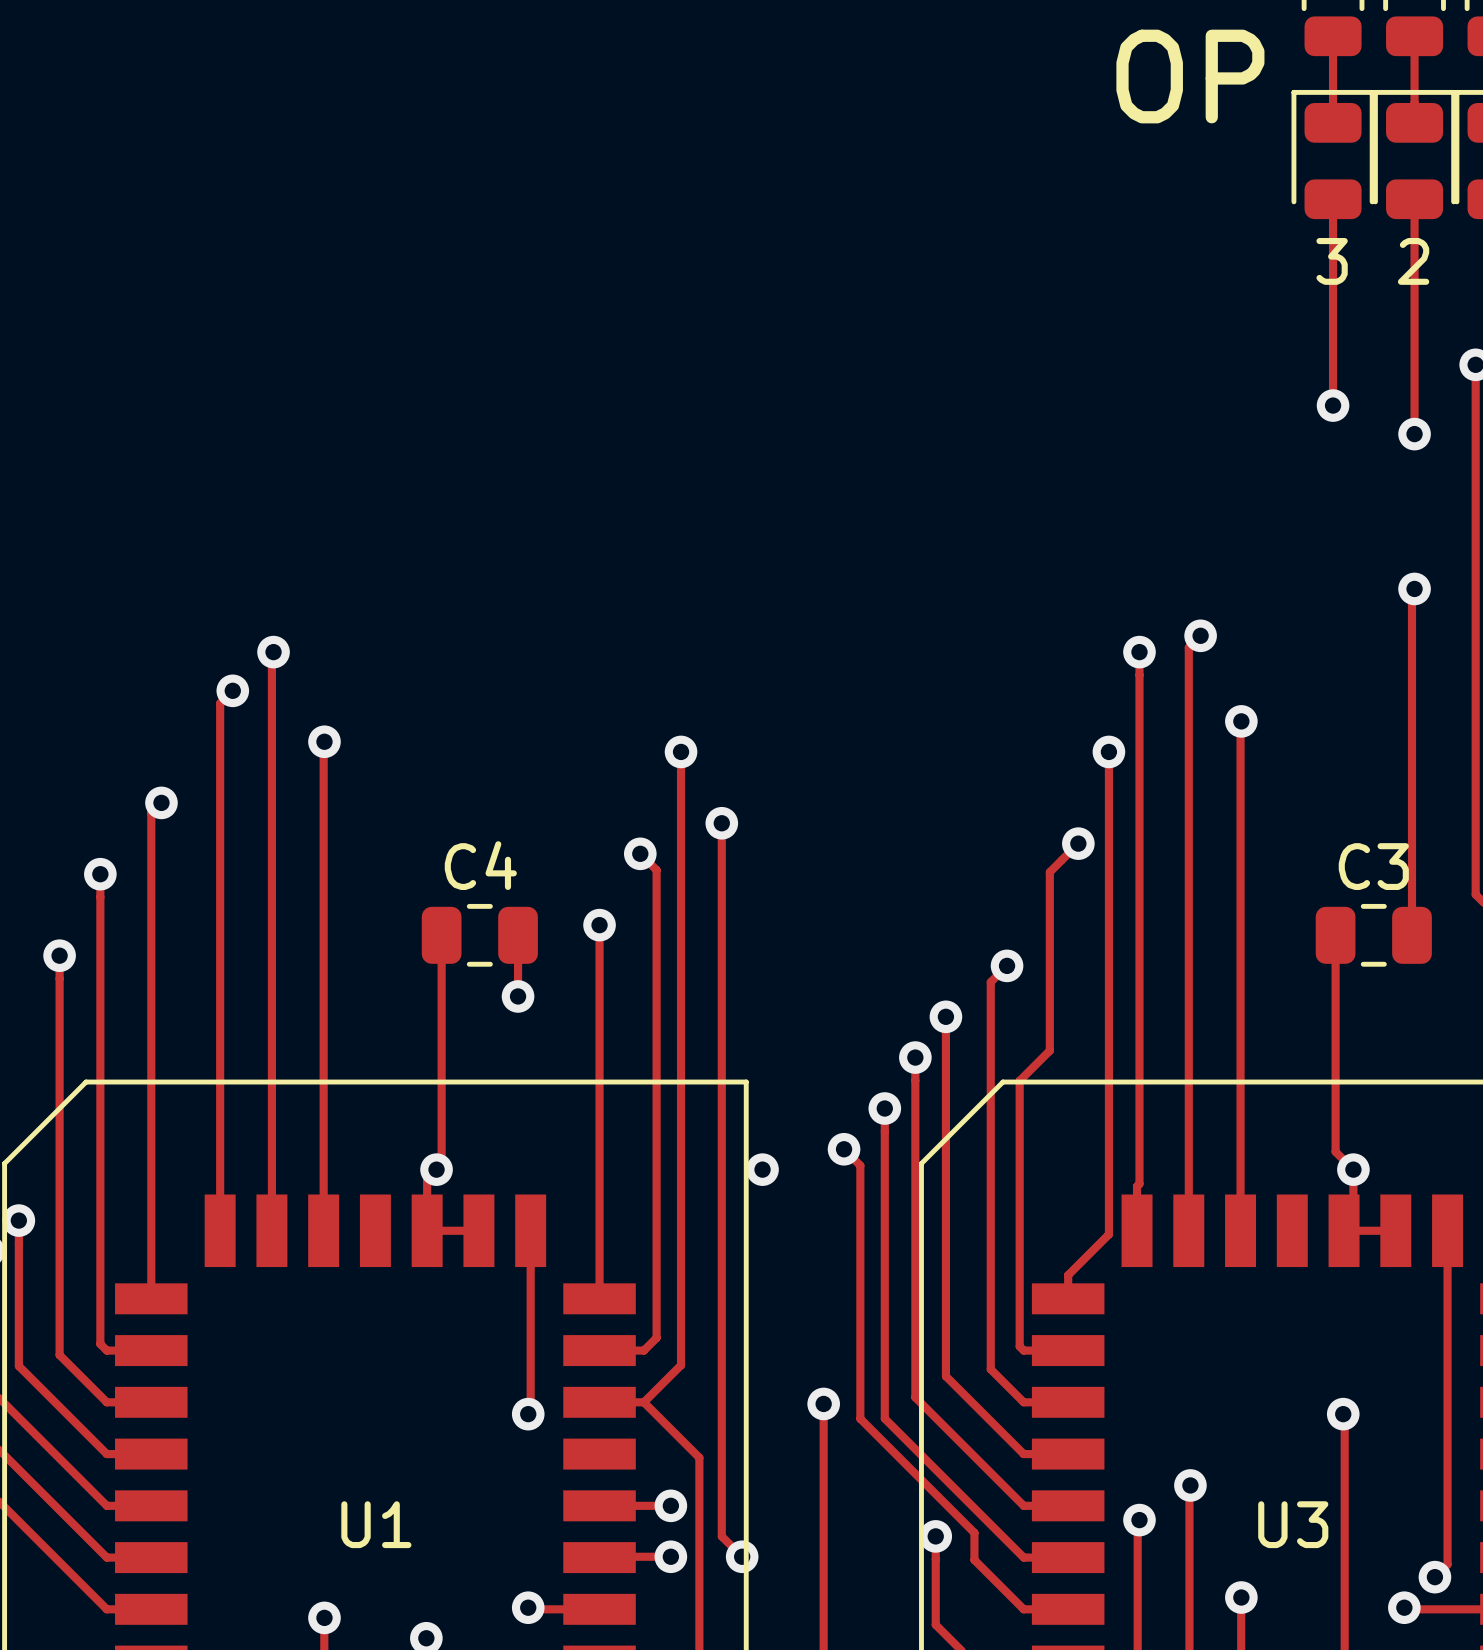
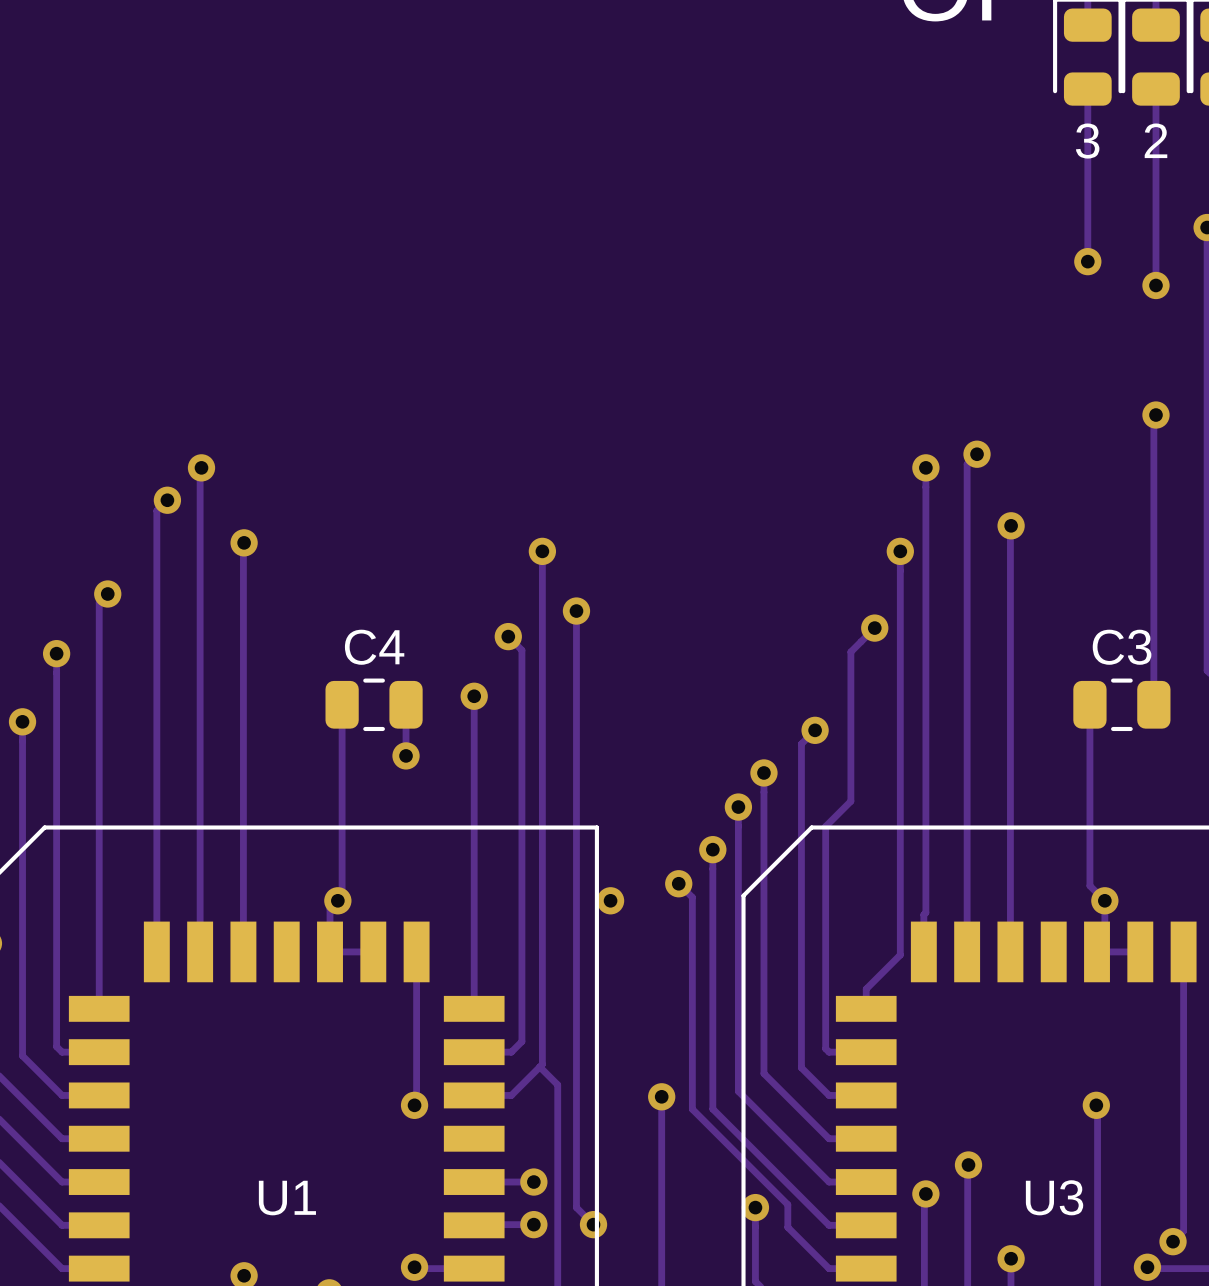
track: (643, 1402) (699, 1457) -> (539, 1066) (557, 1084) (557, 1141)

